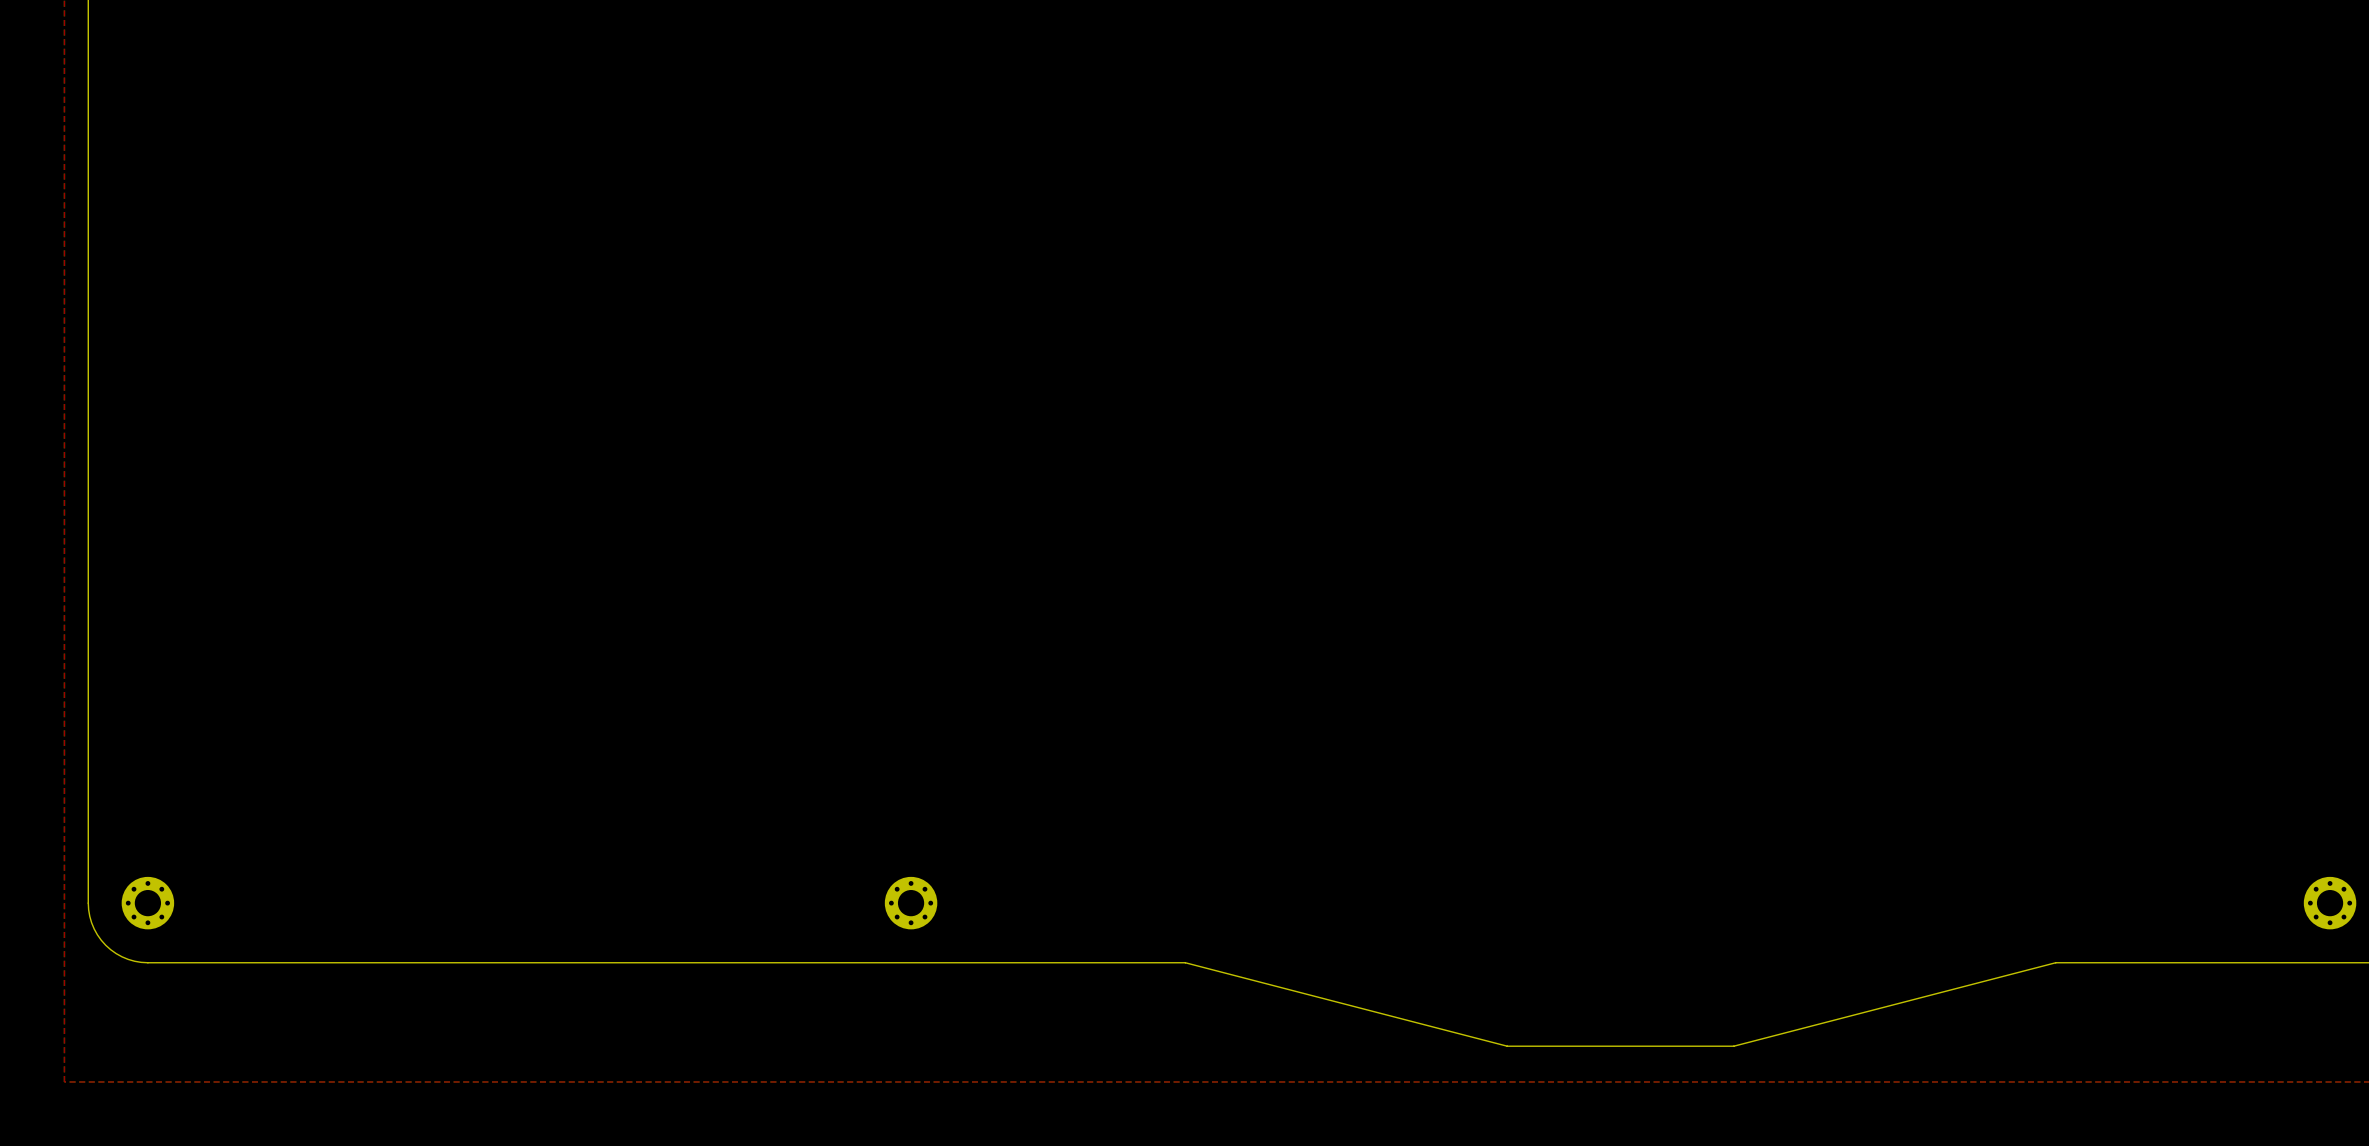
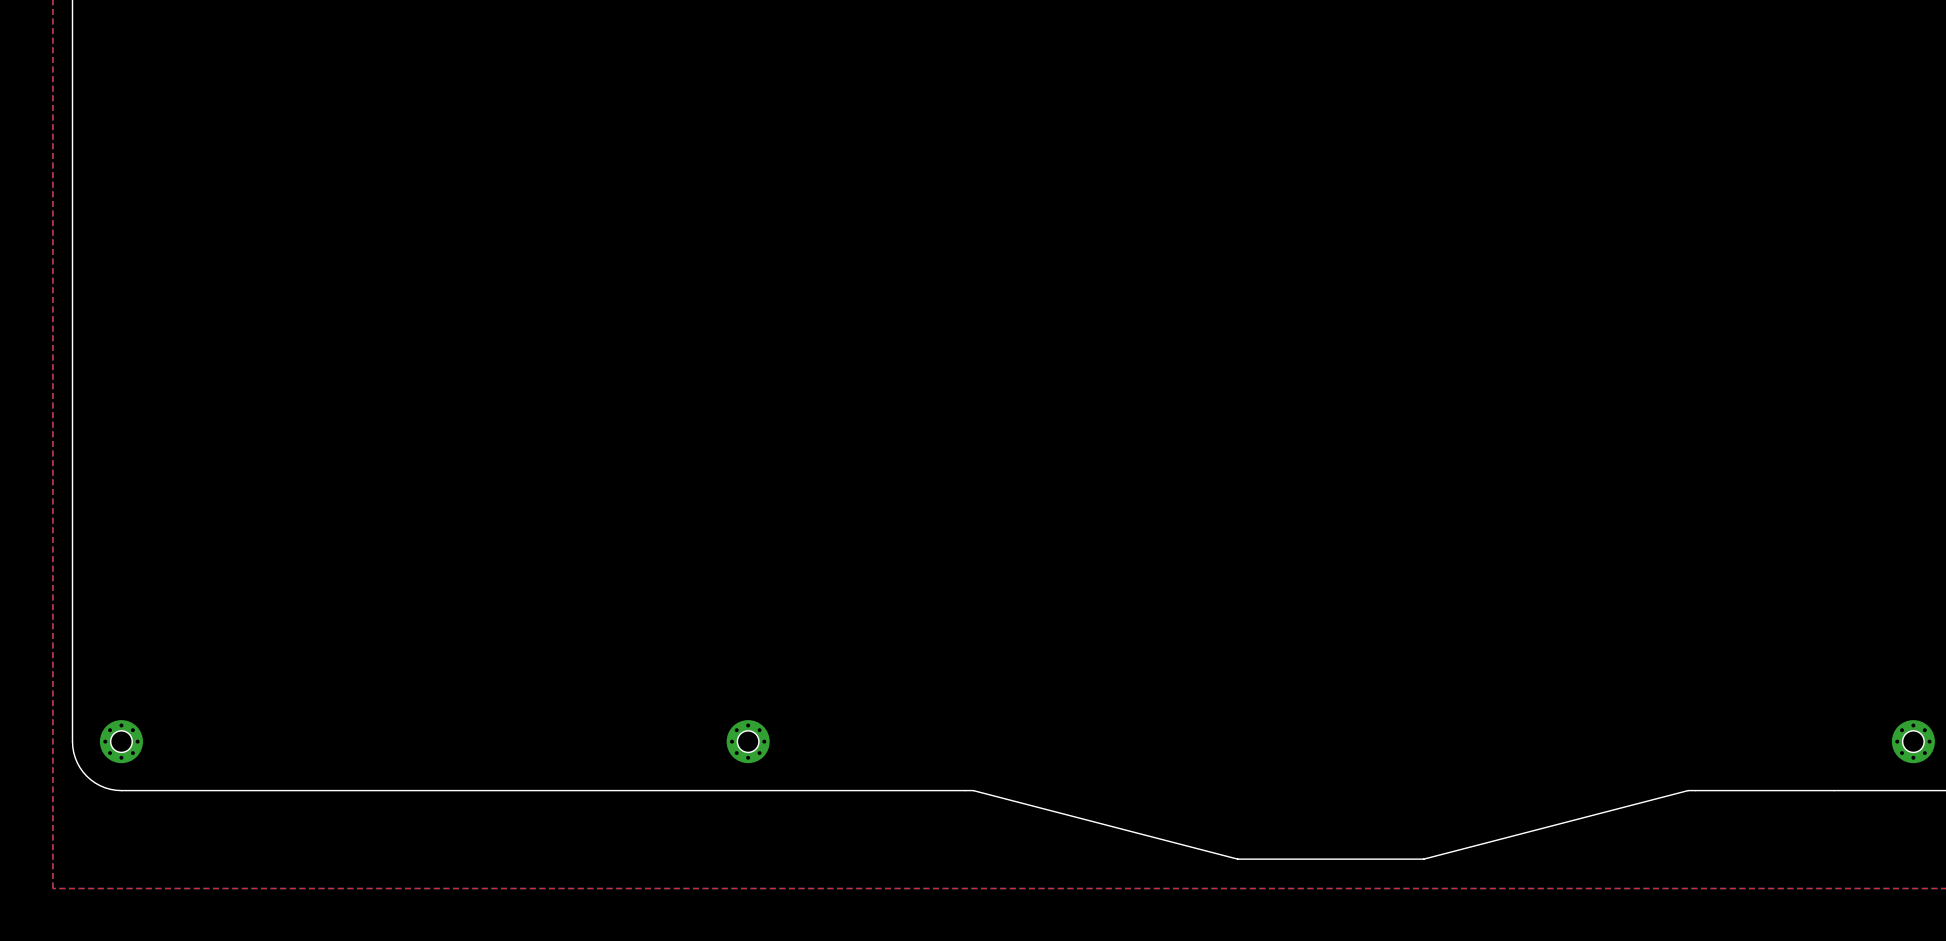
round board edge: none -> [110, 730, 133, 753]
round board edge: none -> [737, 730, 760, 753]
round board edge: none -> [1902, 730, 1925, 753]

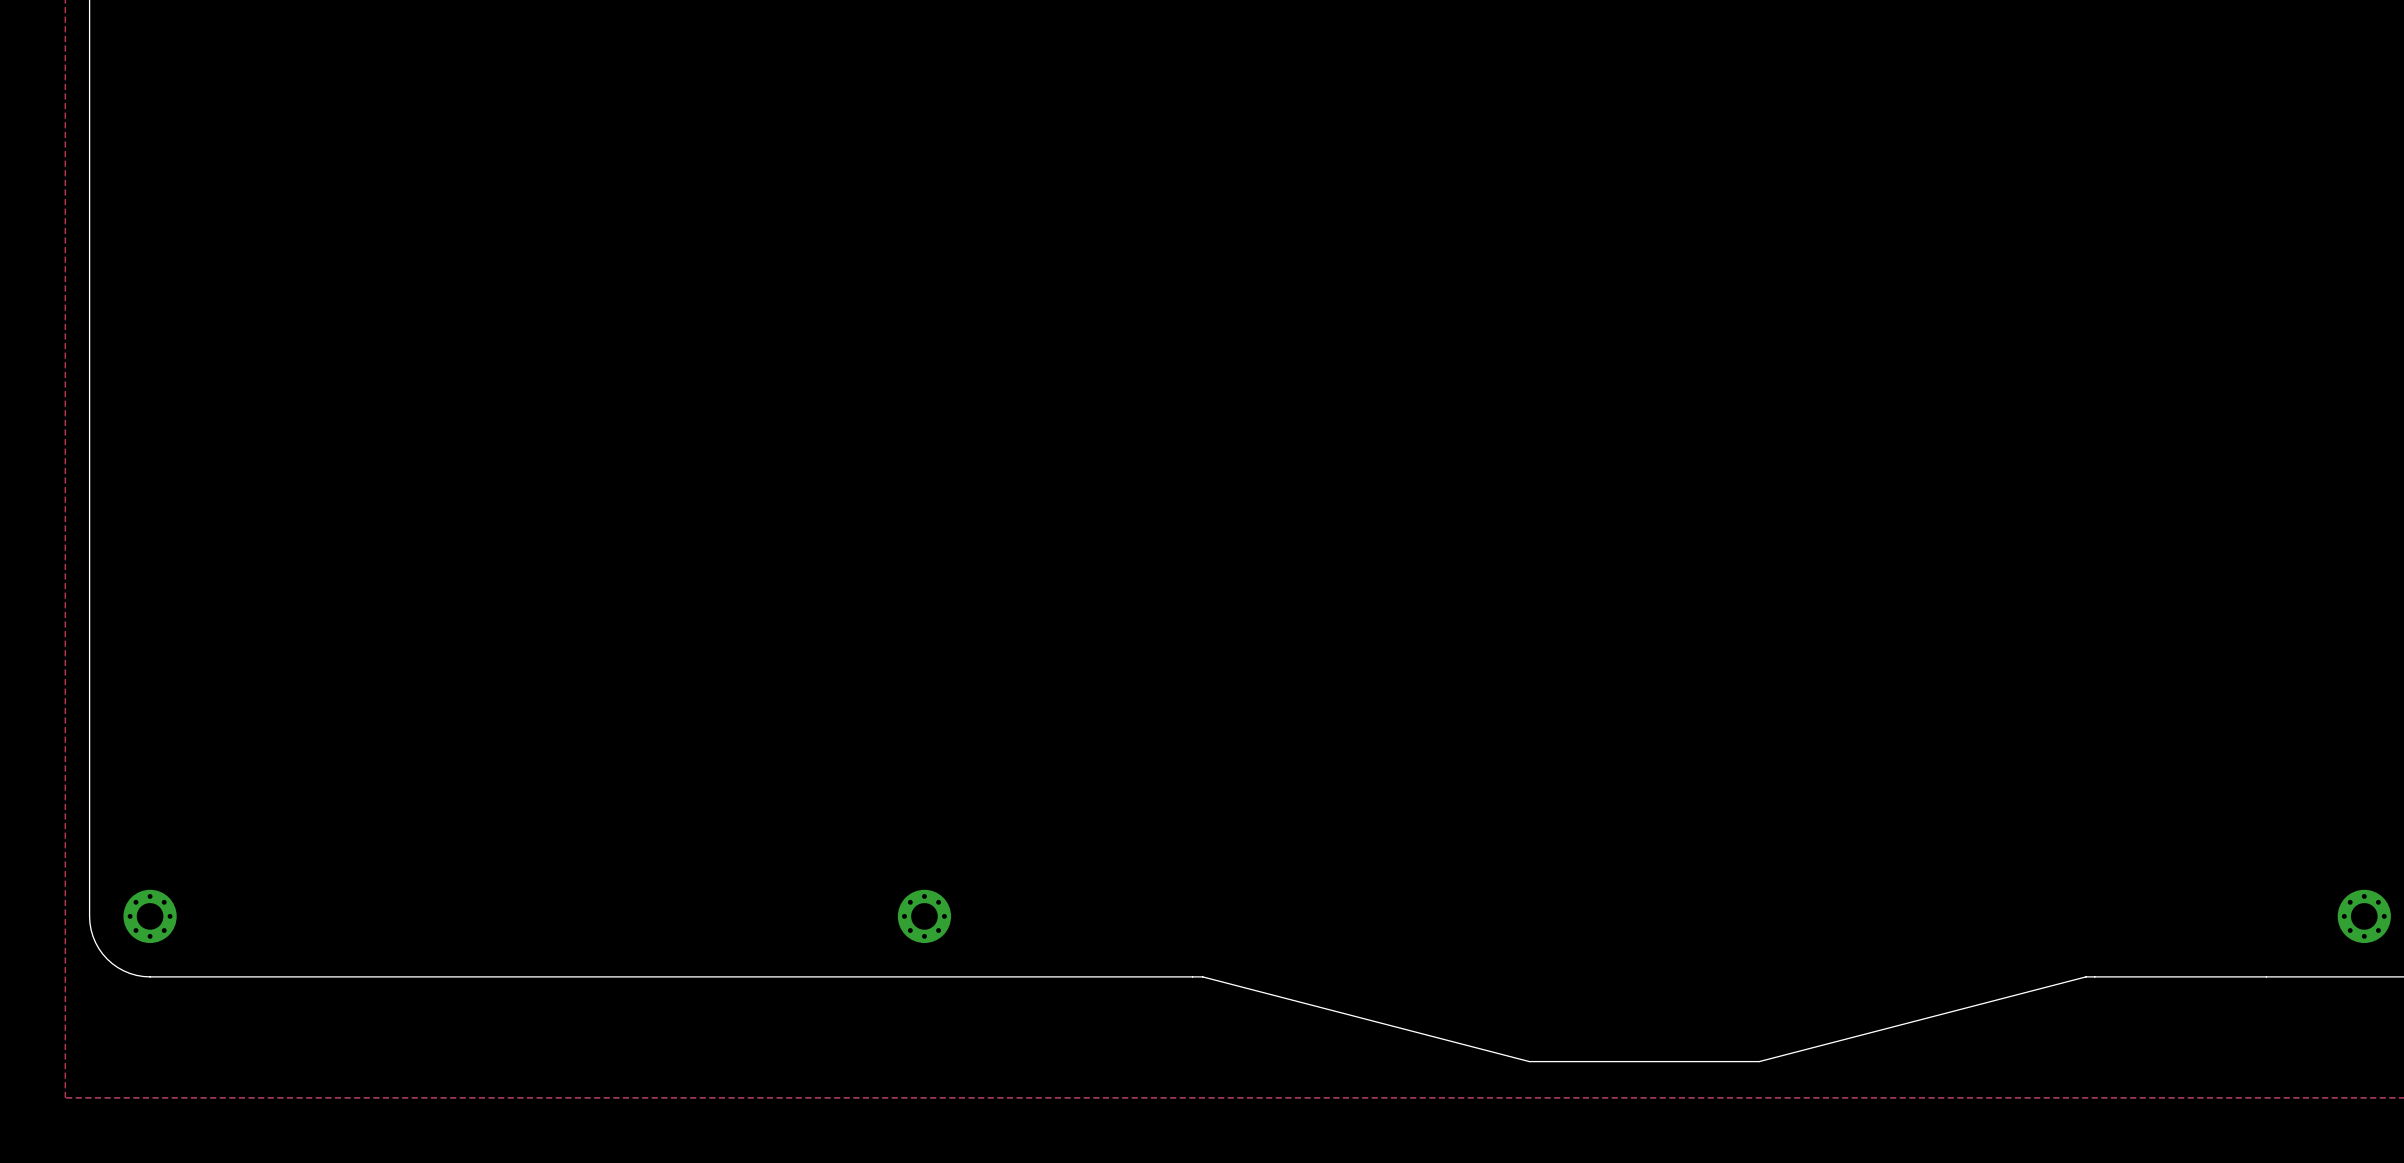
round board edge: [110, 730, 133, 753] -> none
round board edge: [737, 730, 760, 753] -> none
round board edge: [1902, 730, 1925, 753] -> none

